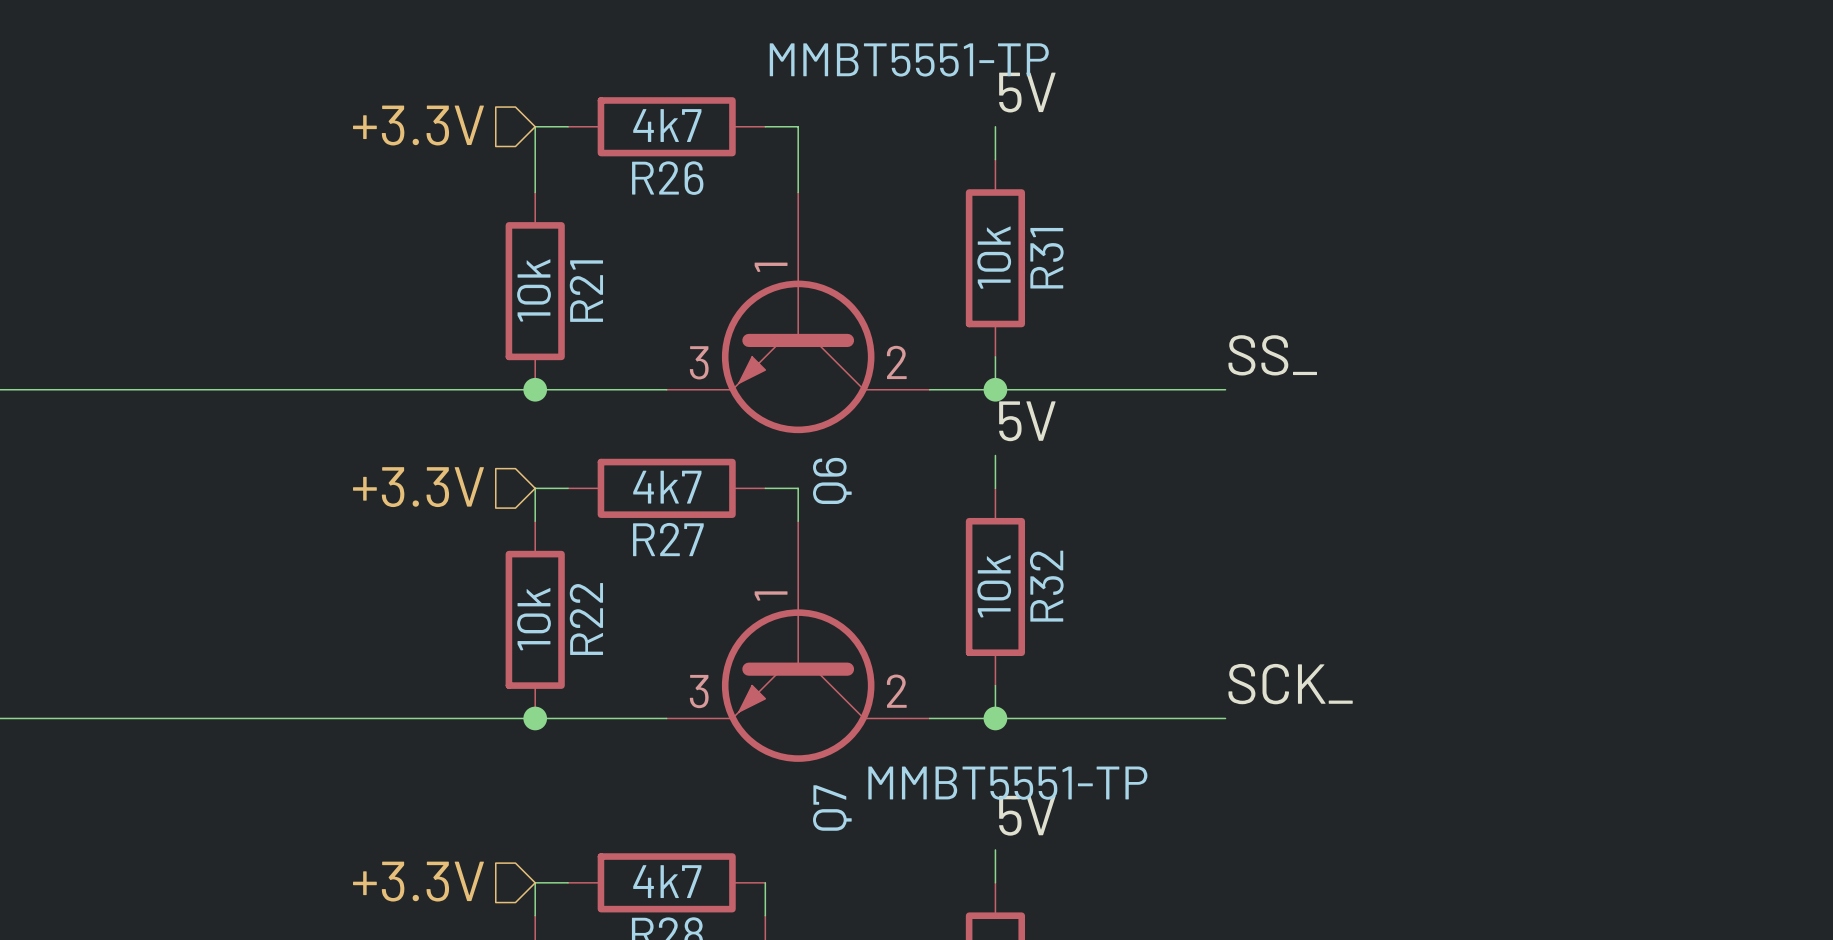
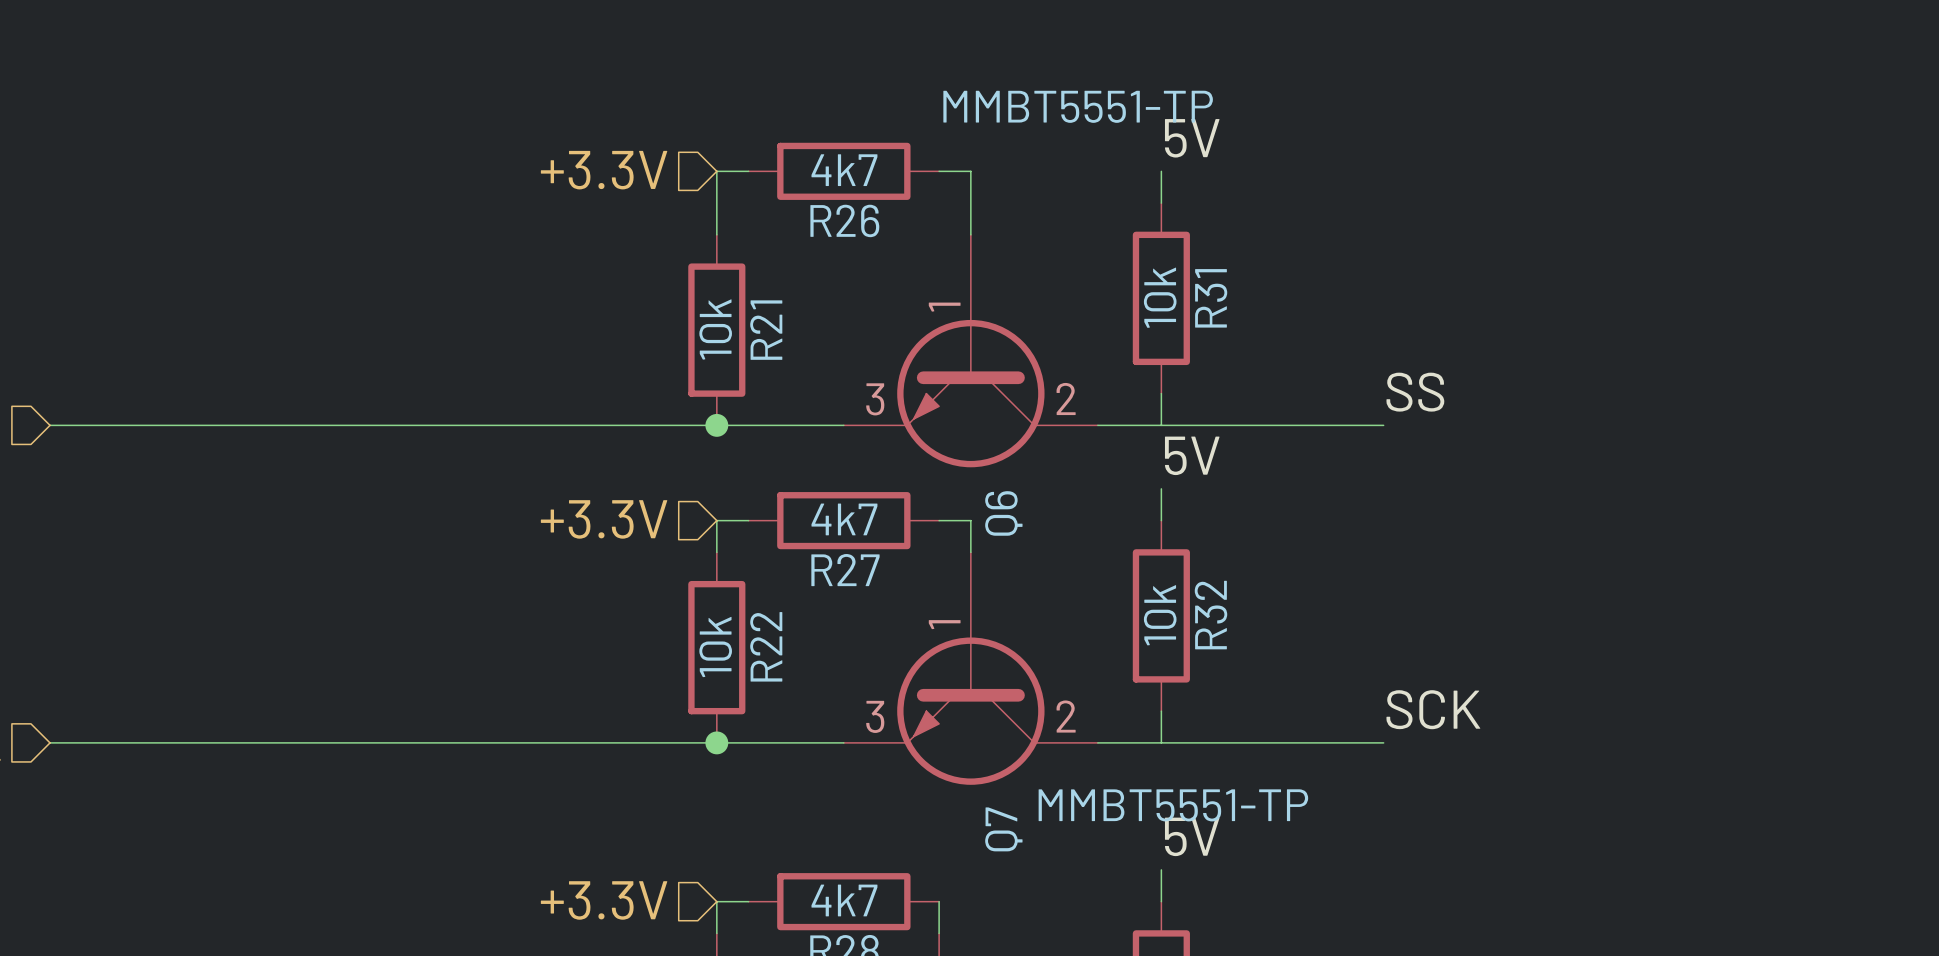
label: SS_ (1272, 355) -> SS (1415, 392)
junction: (995, 389) -> none
label: SCK_ (1290, 684) -> SCK (1433, 709)
junction: (995, 718) -> none

